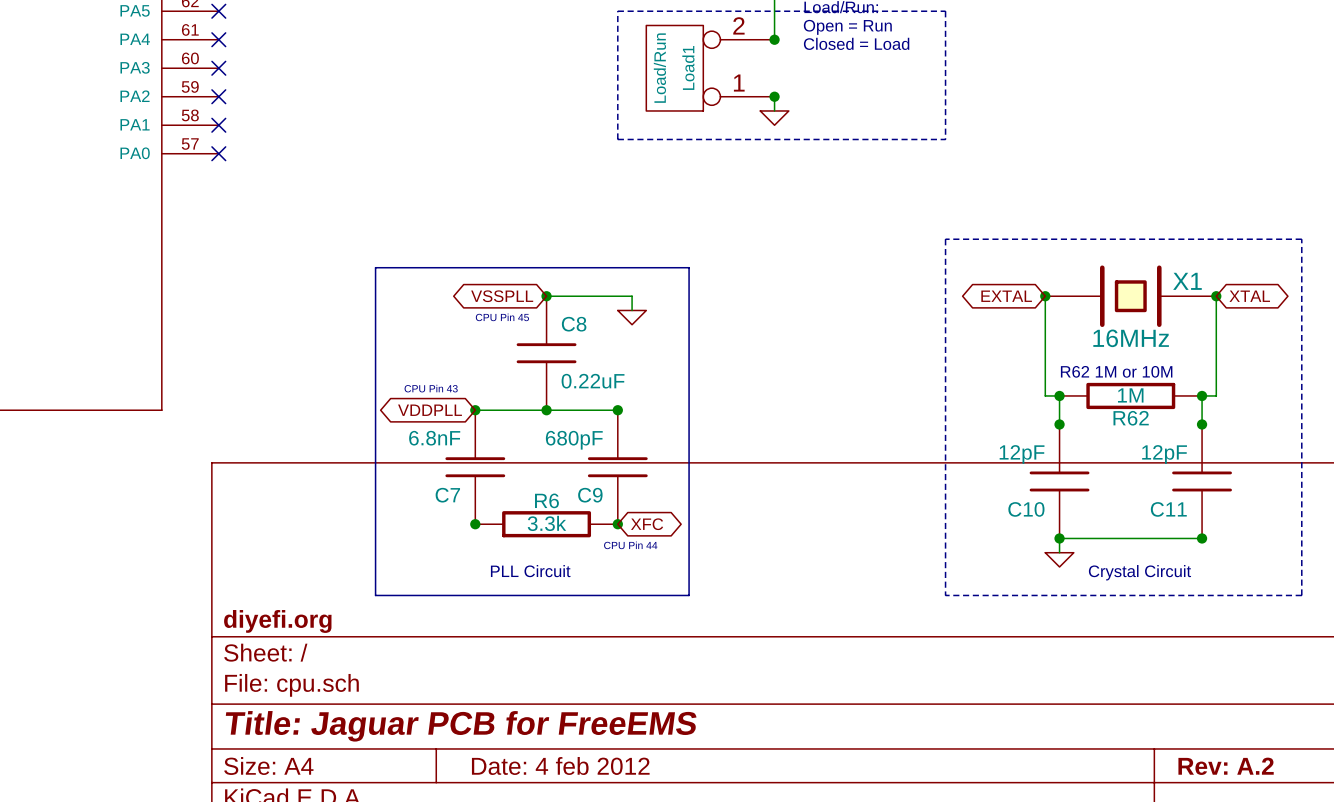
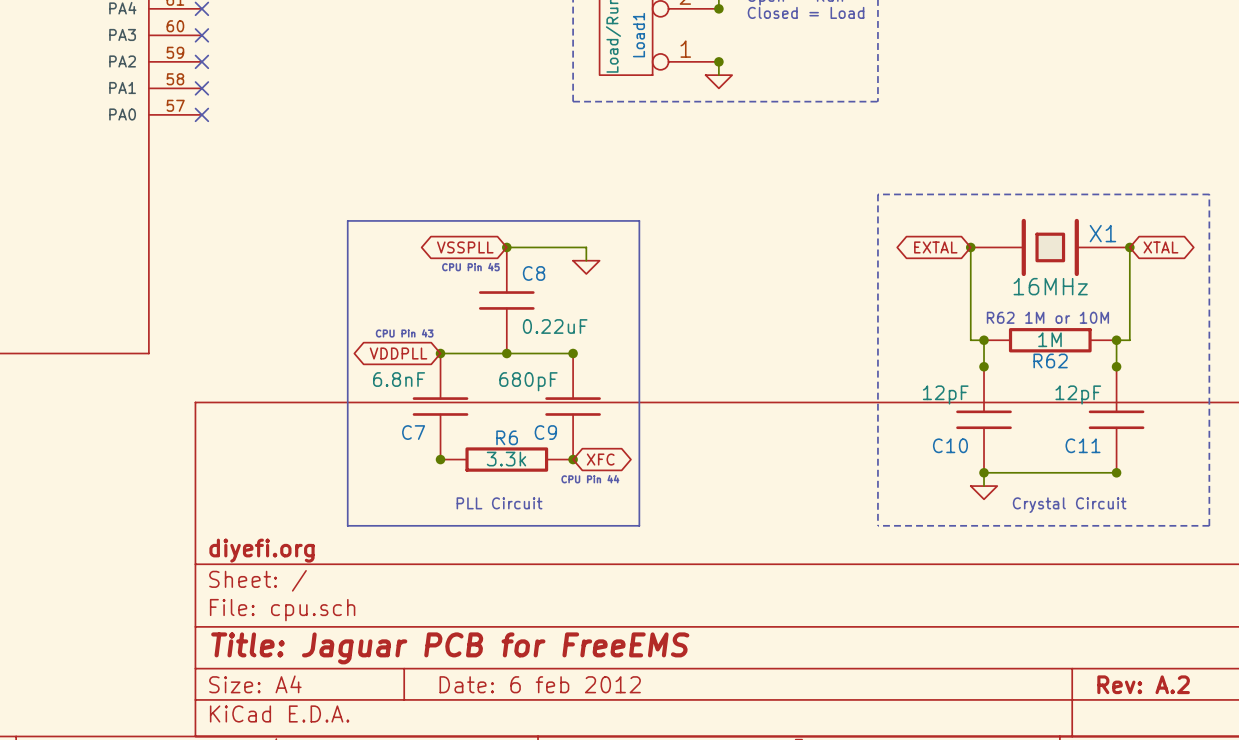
title block: Date: 4 feb 2012 (560, 765) -> Date: 6 feb 2012 (540, 684)

